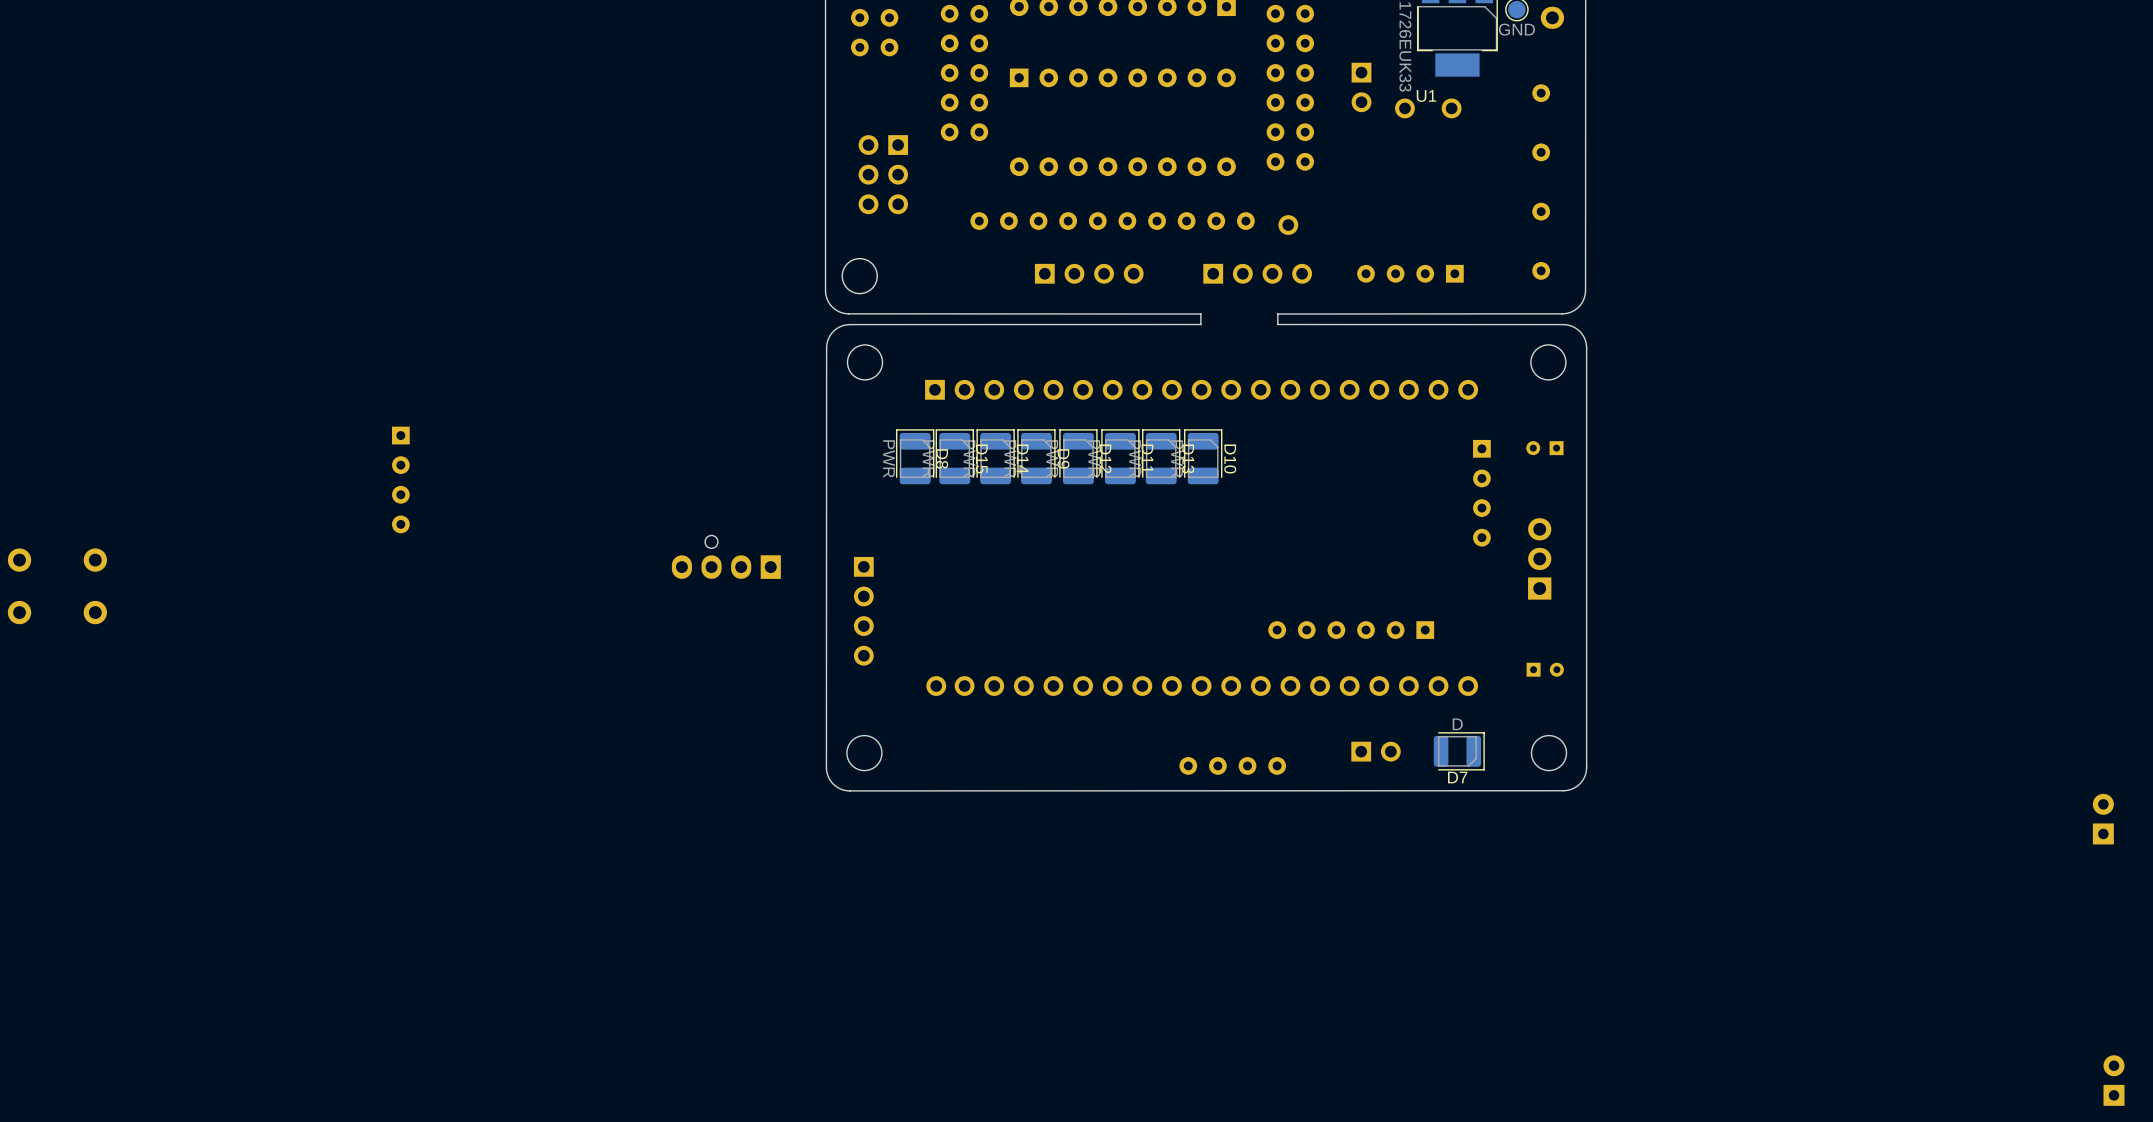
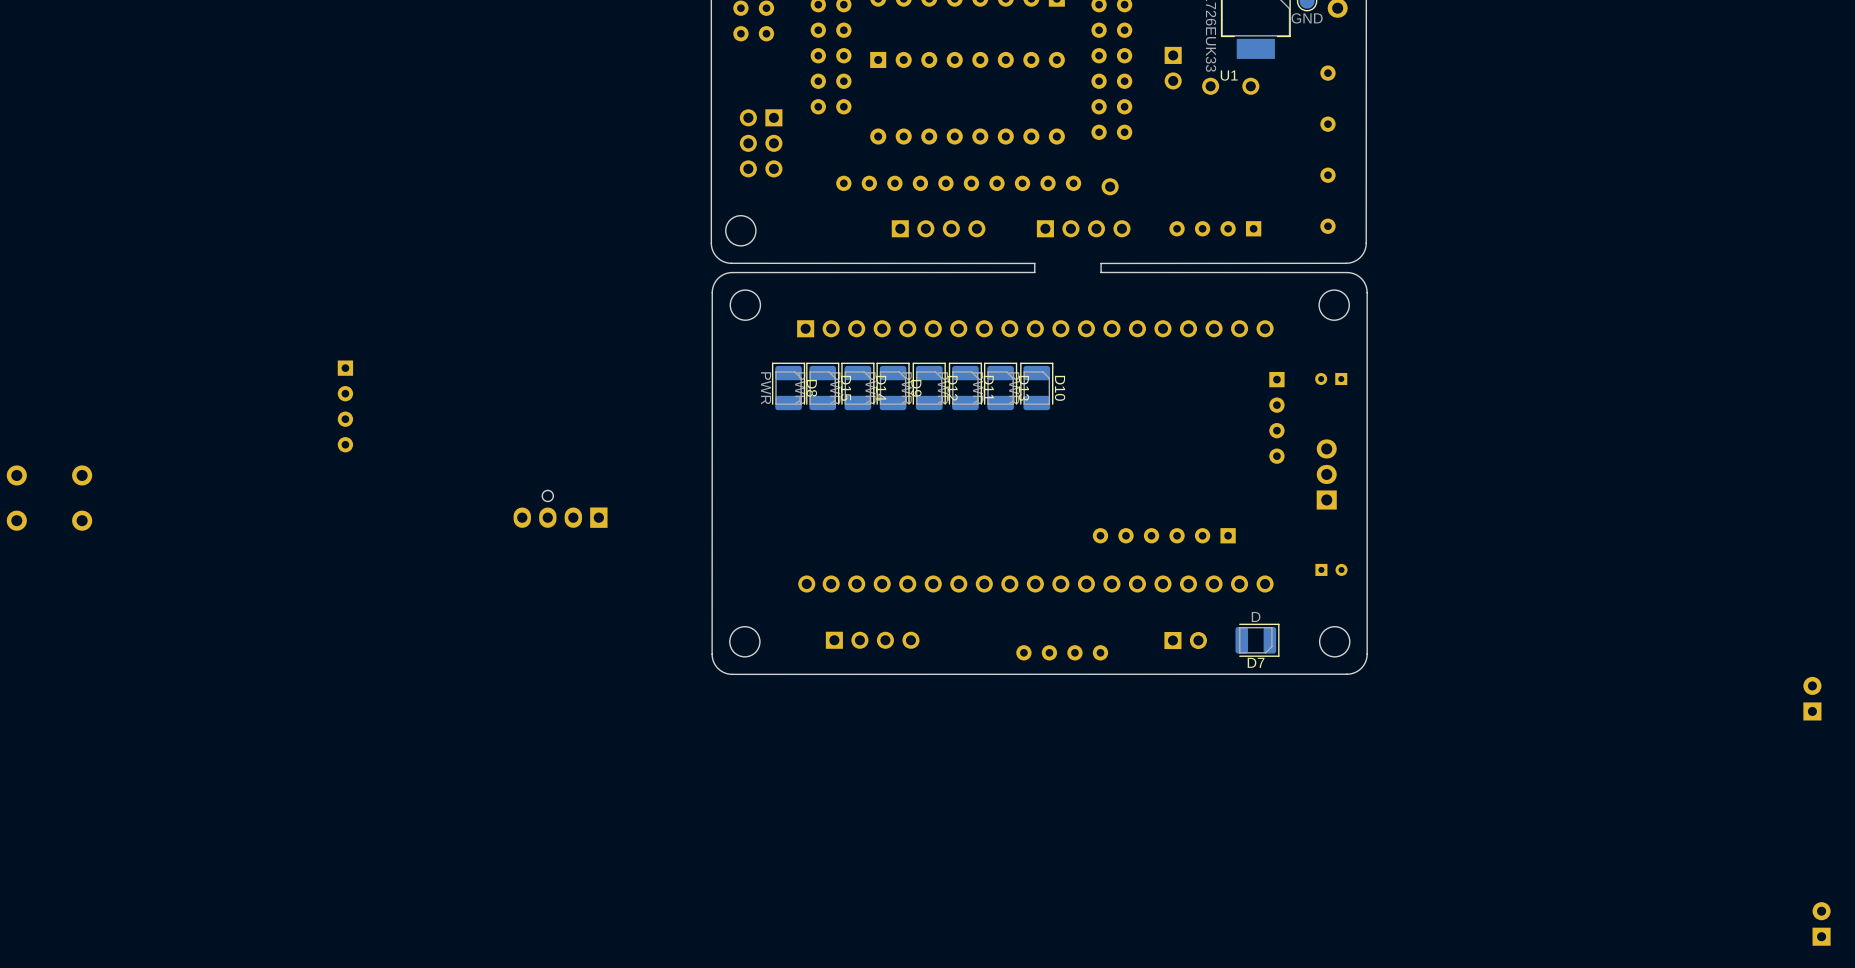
part position: (726, 557) -> (560, 509)
part rotation: 0° (863, 611) -> 90° counterclockwise (872, 640)
part position: (863, 611) -> (872, 640)

